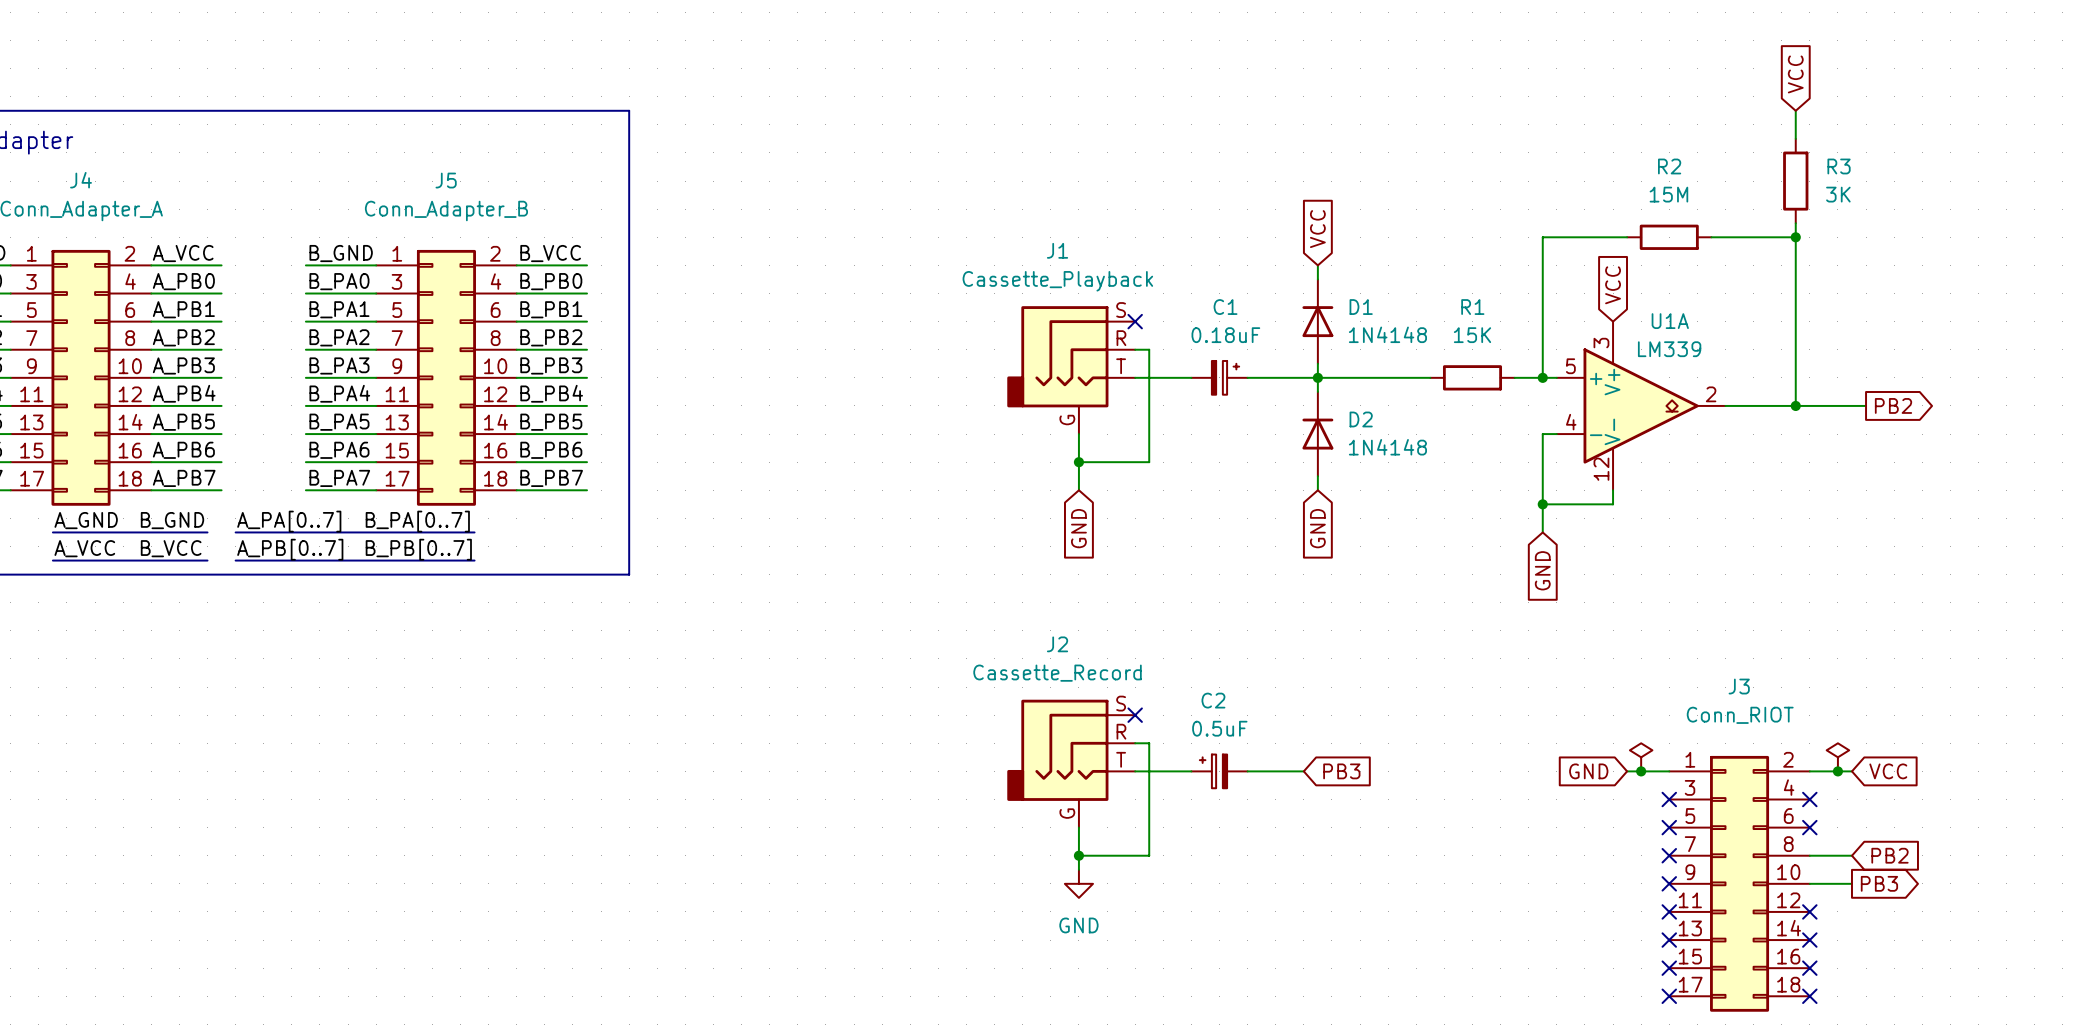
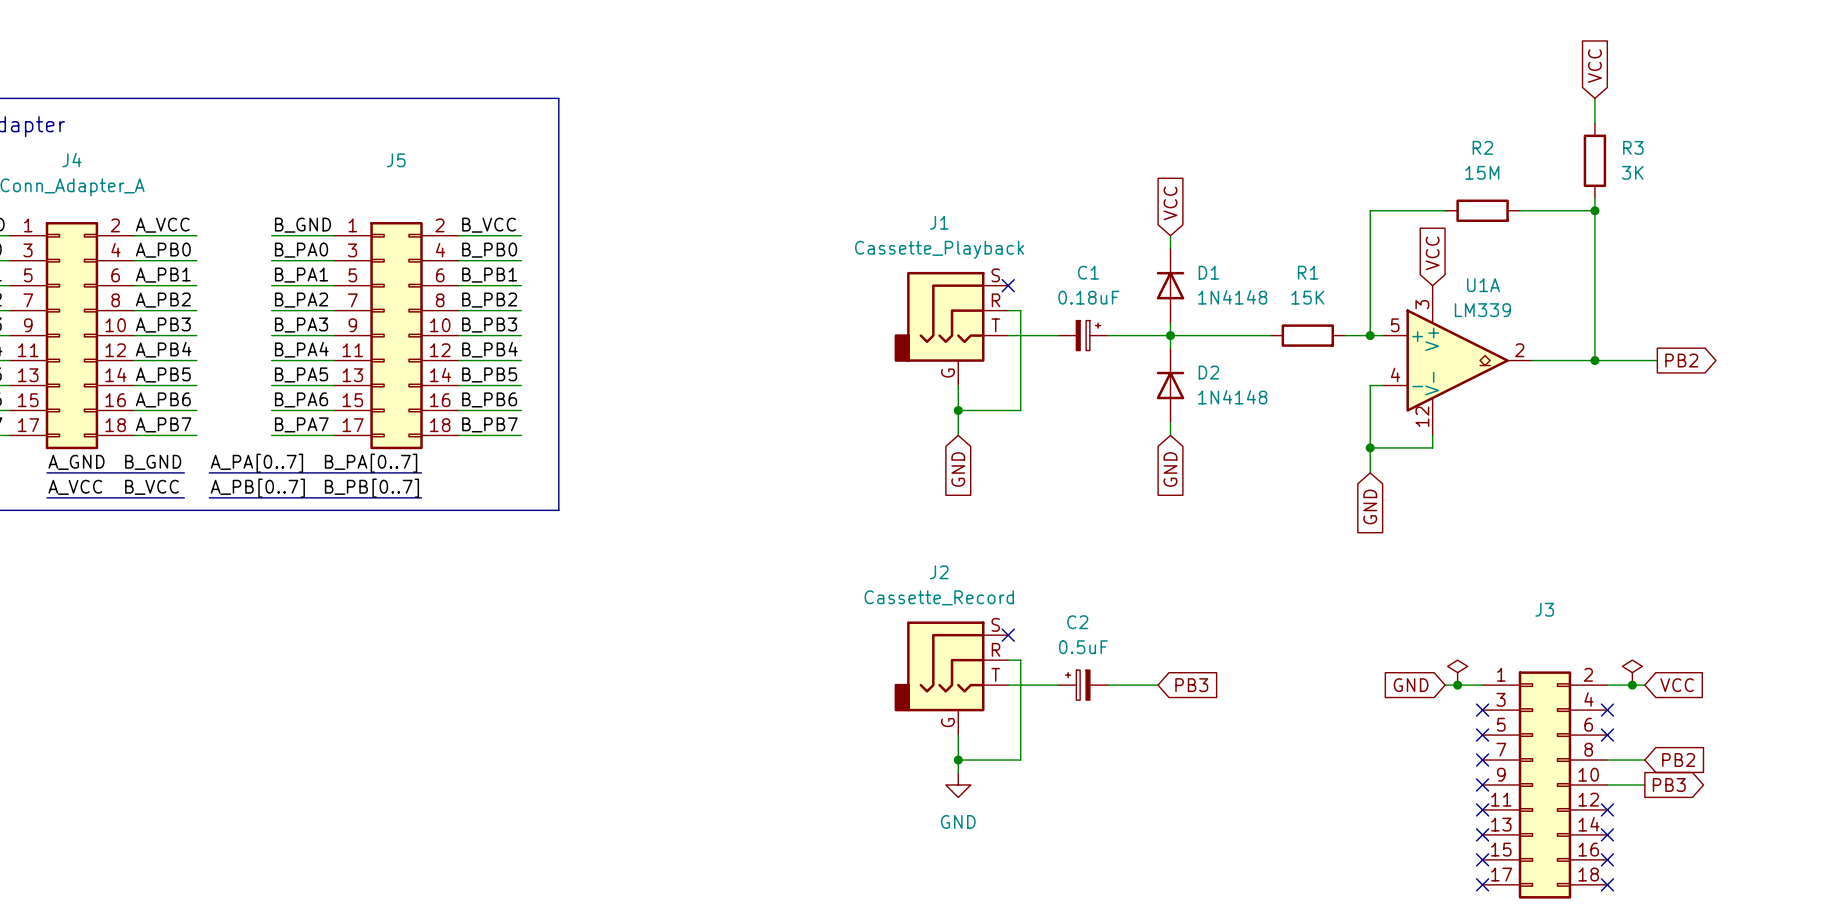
J5 value: Conn_Adapter_B (446, 210) -> none
J3 value: Conn_RIOT (1740, 715) -> none

